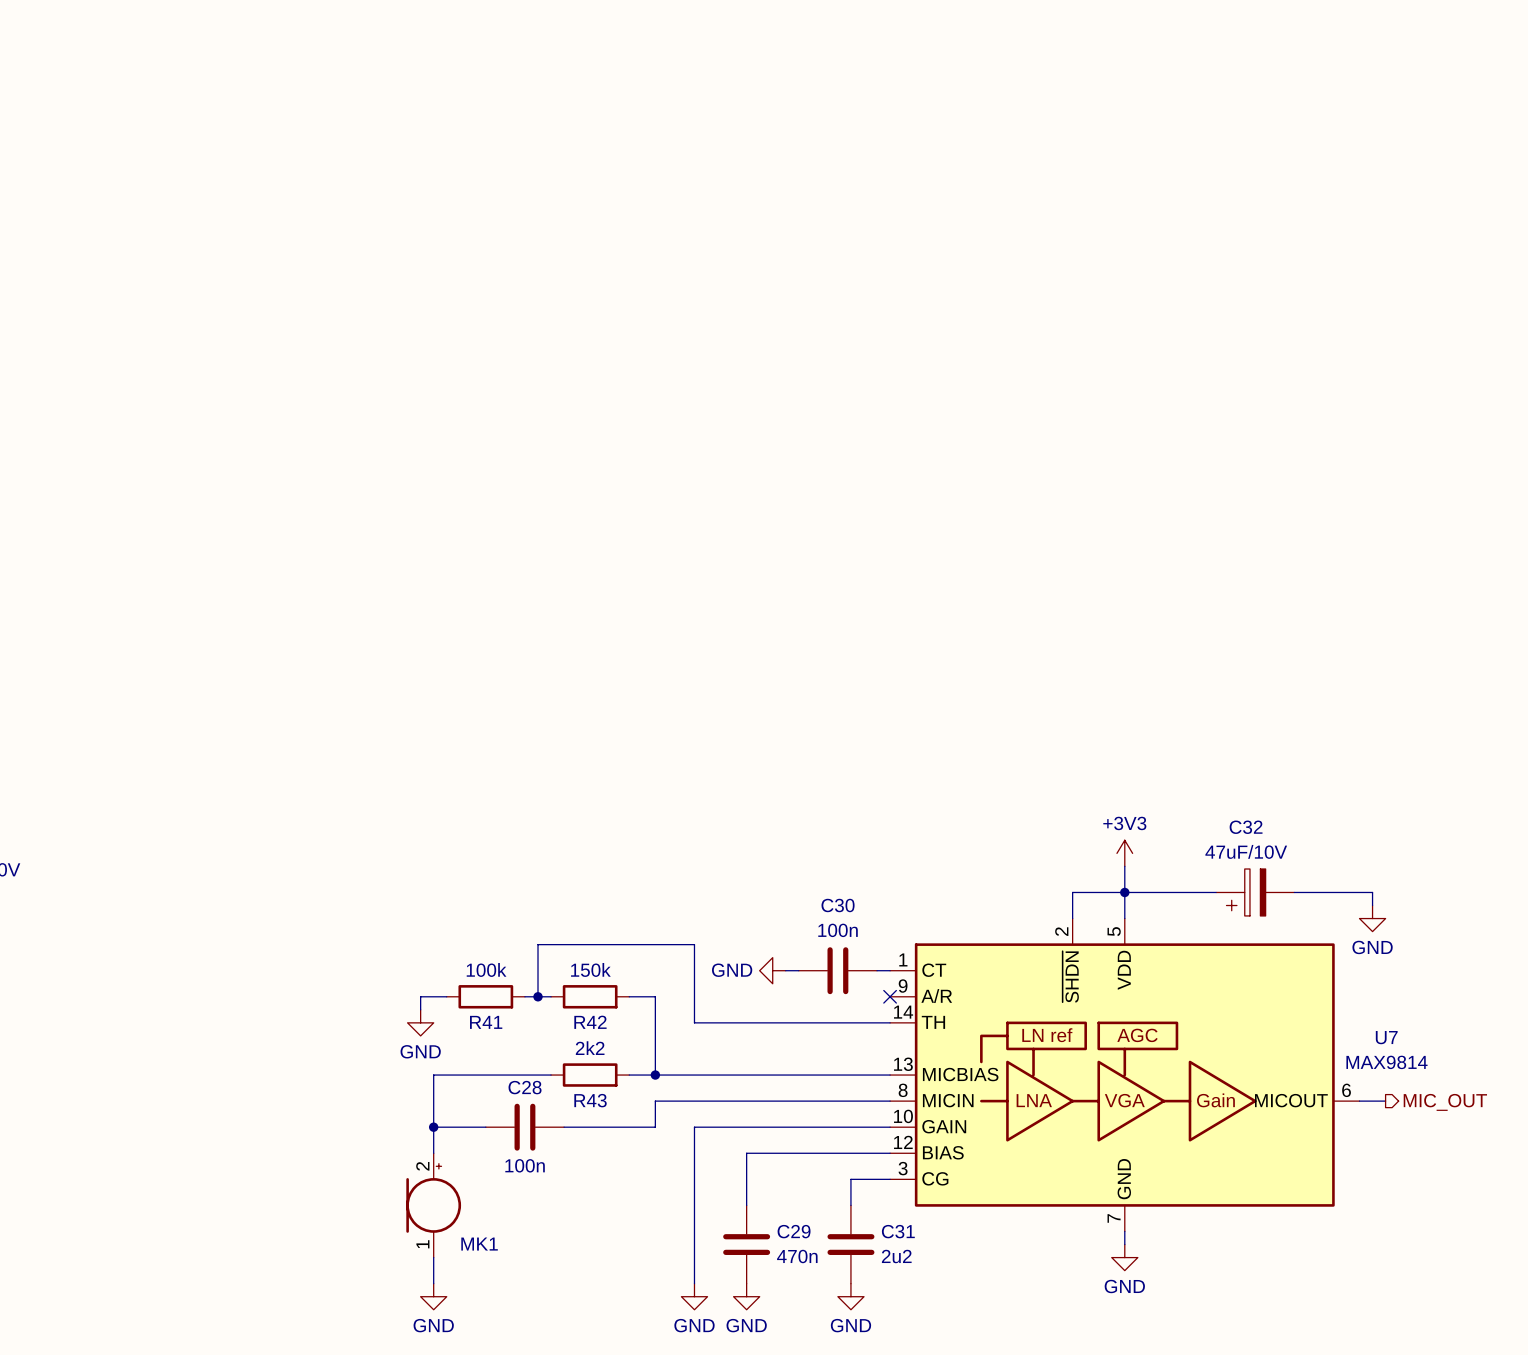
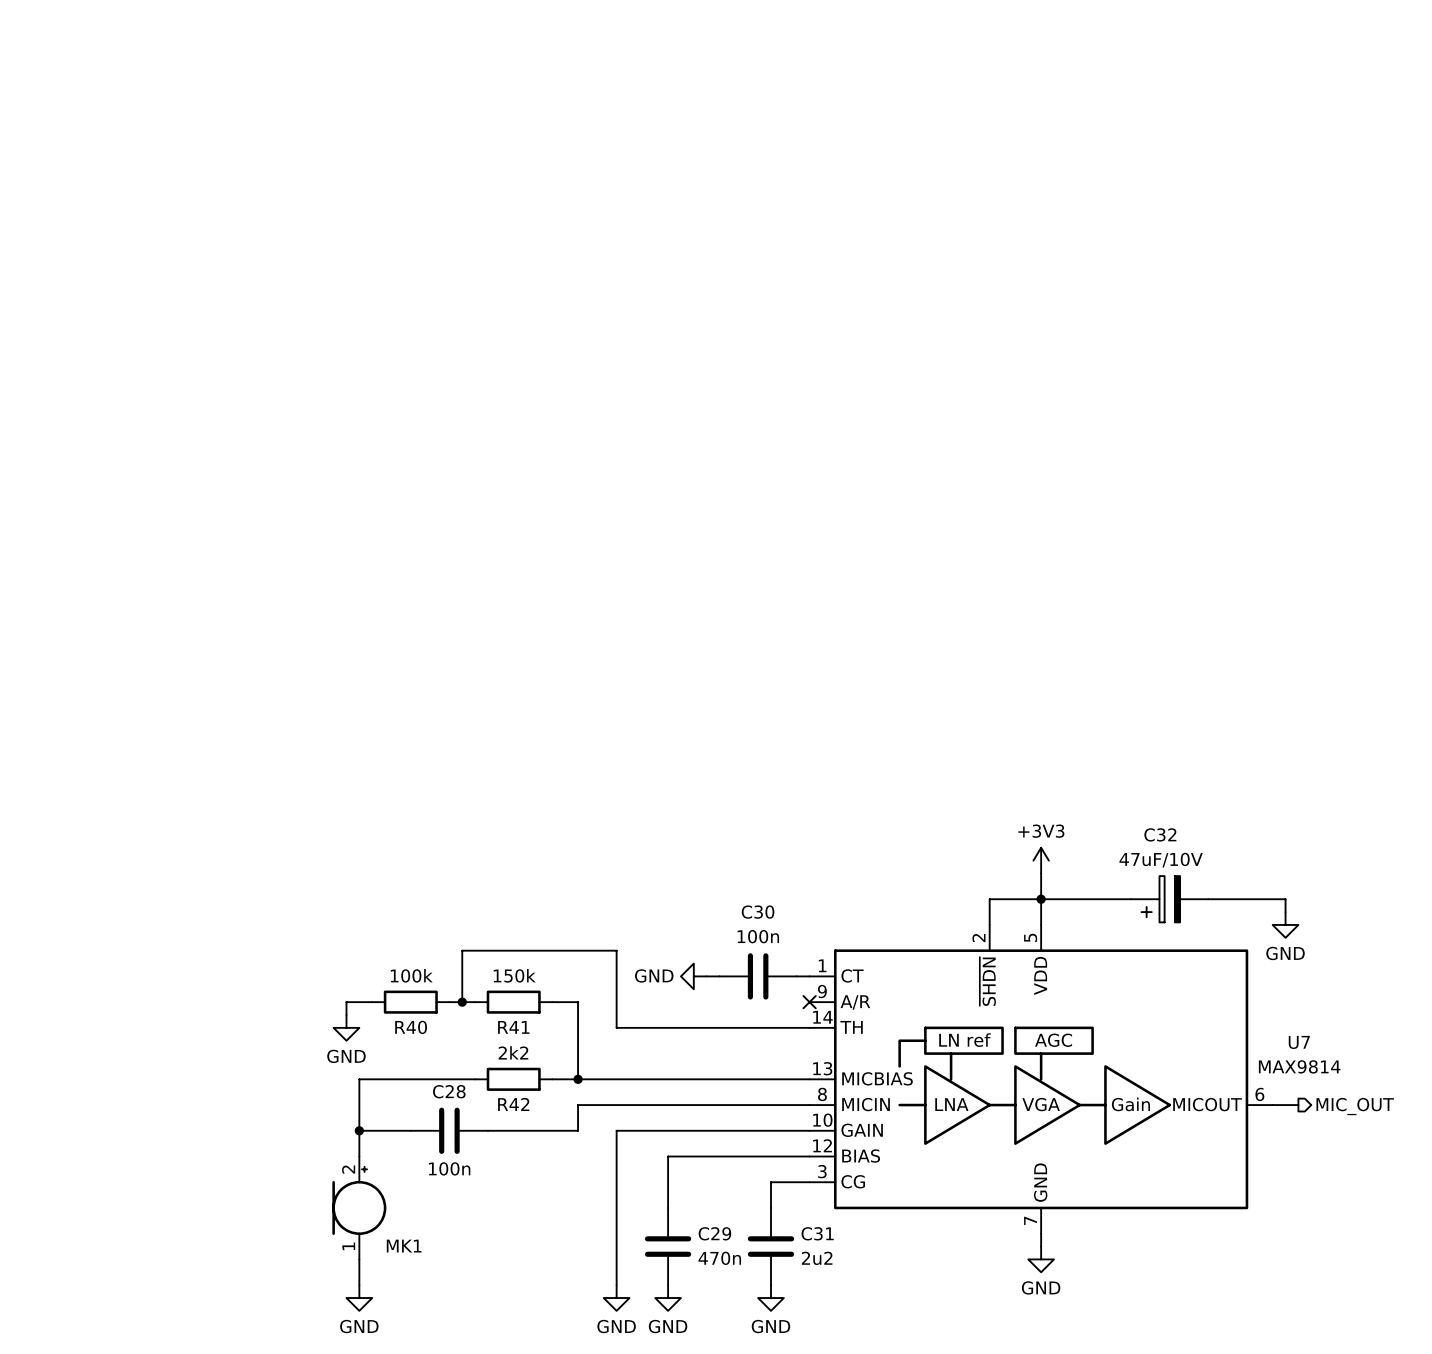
R41 name: R41 (486, 1022) -> R40 (411, 1027)
R42 name: R42 (590, 1022) -> R41 (513, 1027)
R43 name: R43 (590, 1100) -> R42 (513, 1104)

